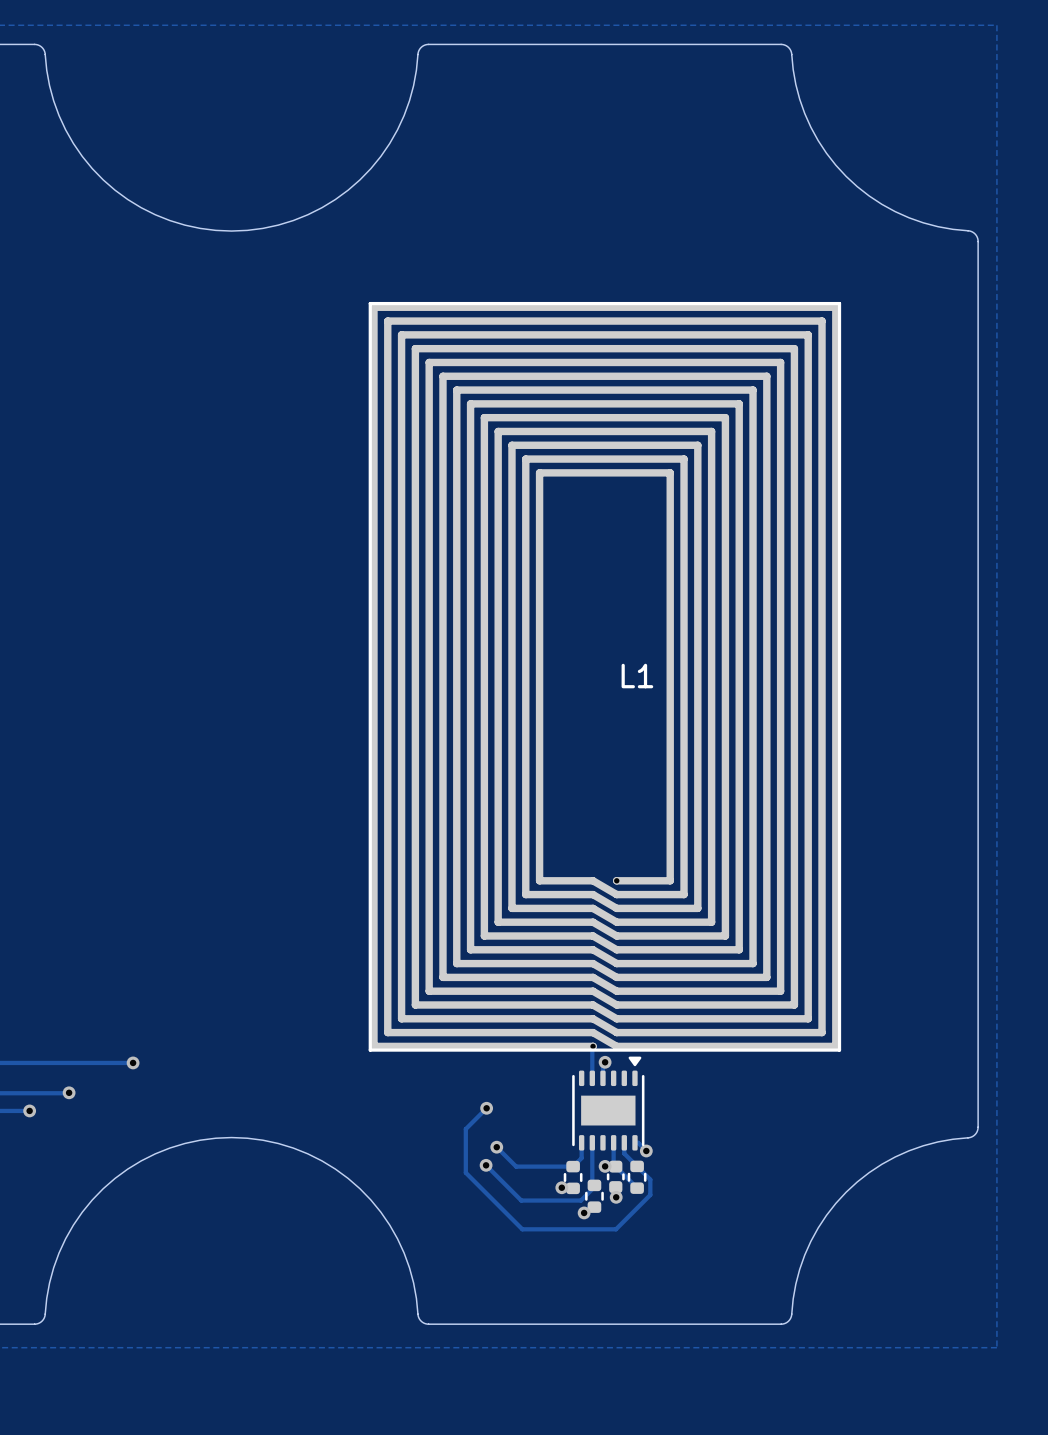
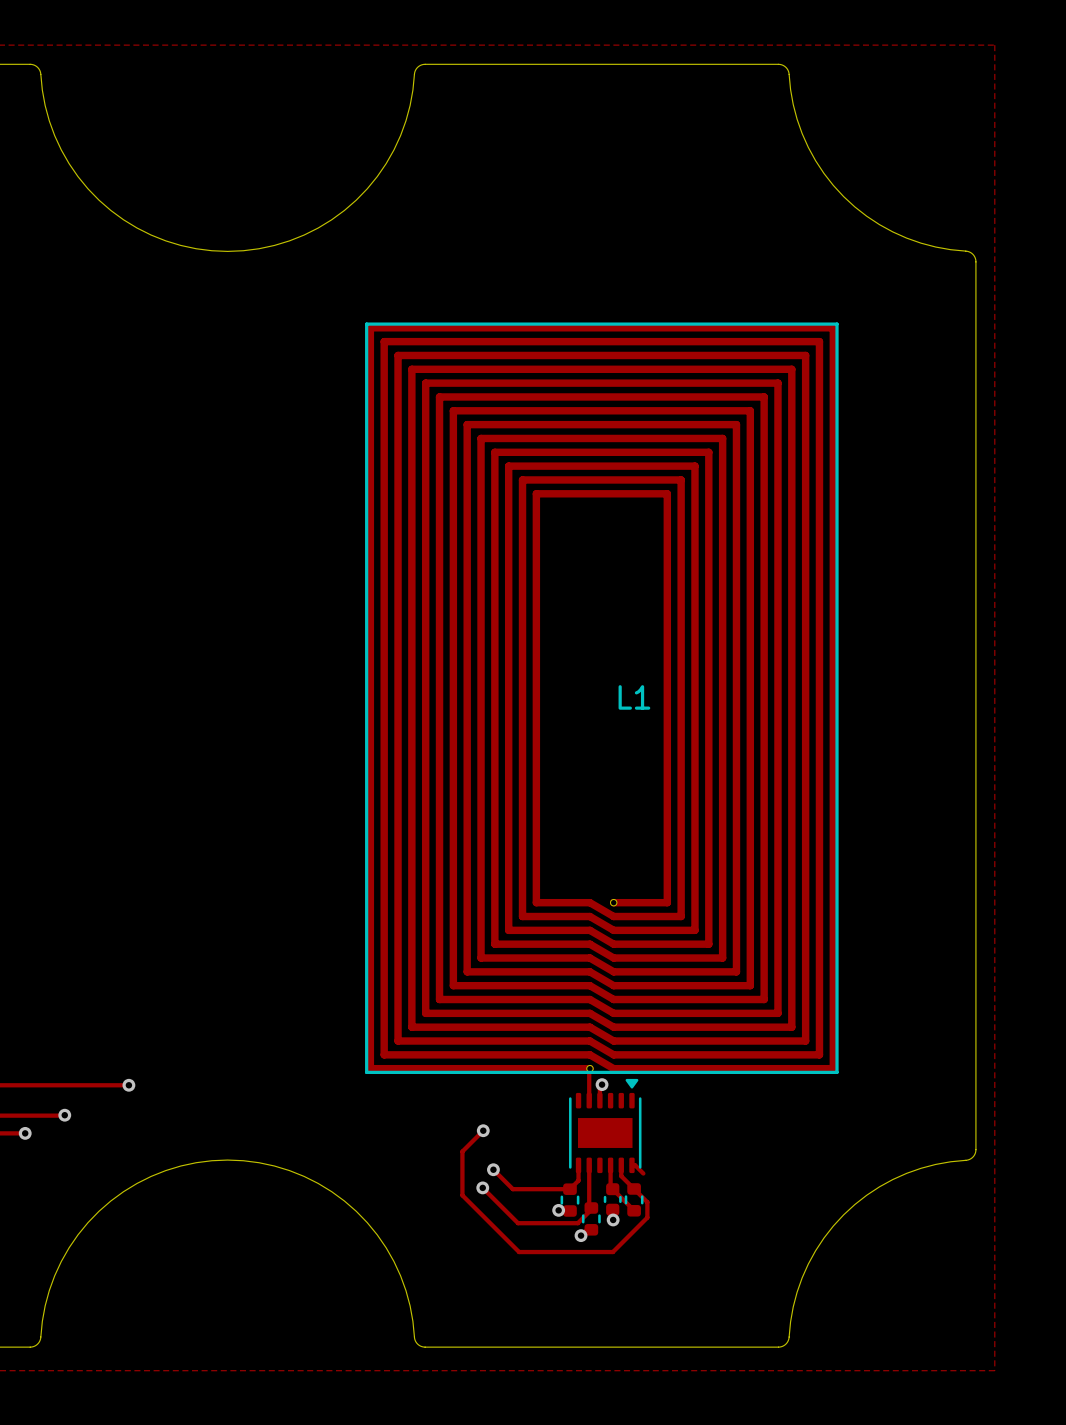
via: (646, 1150) -> none
via: (605, 1166) -> none

